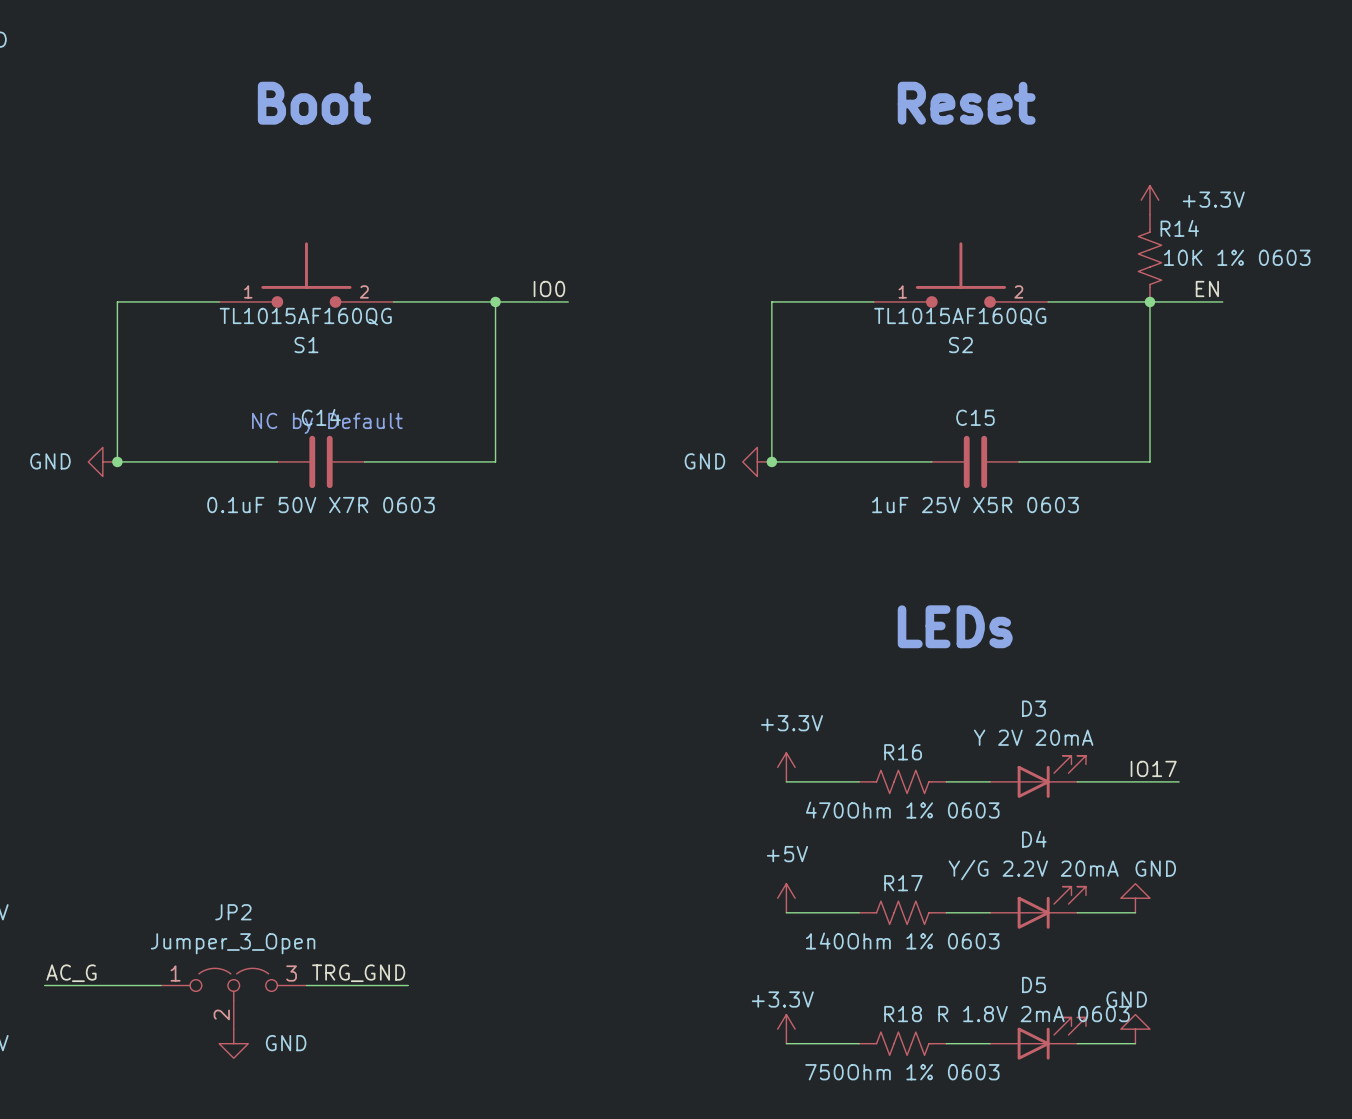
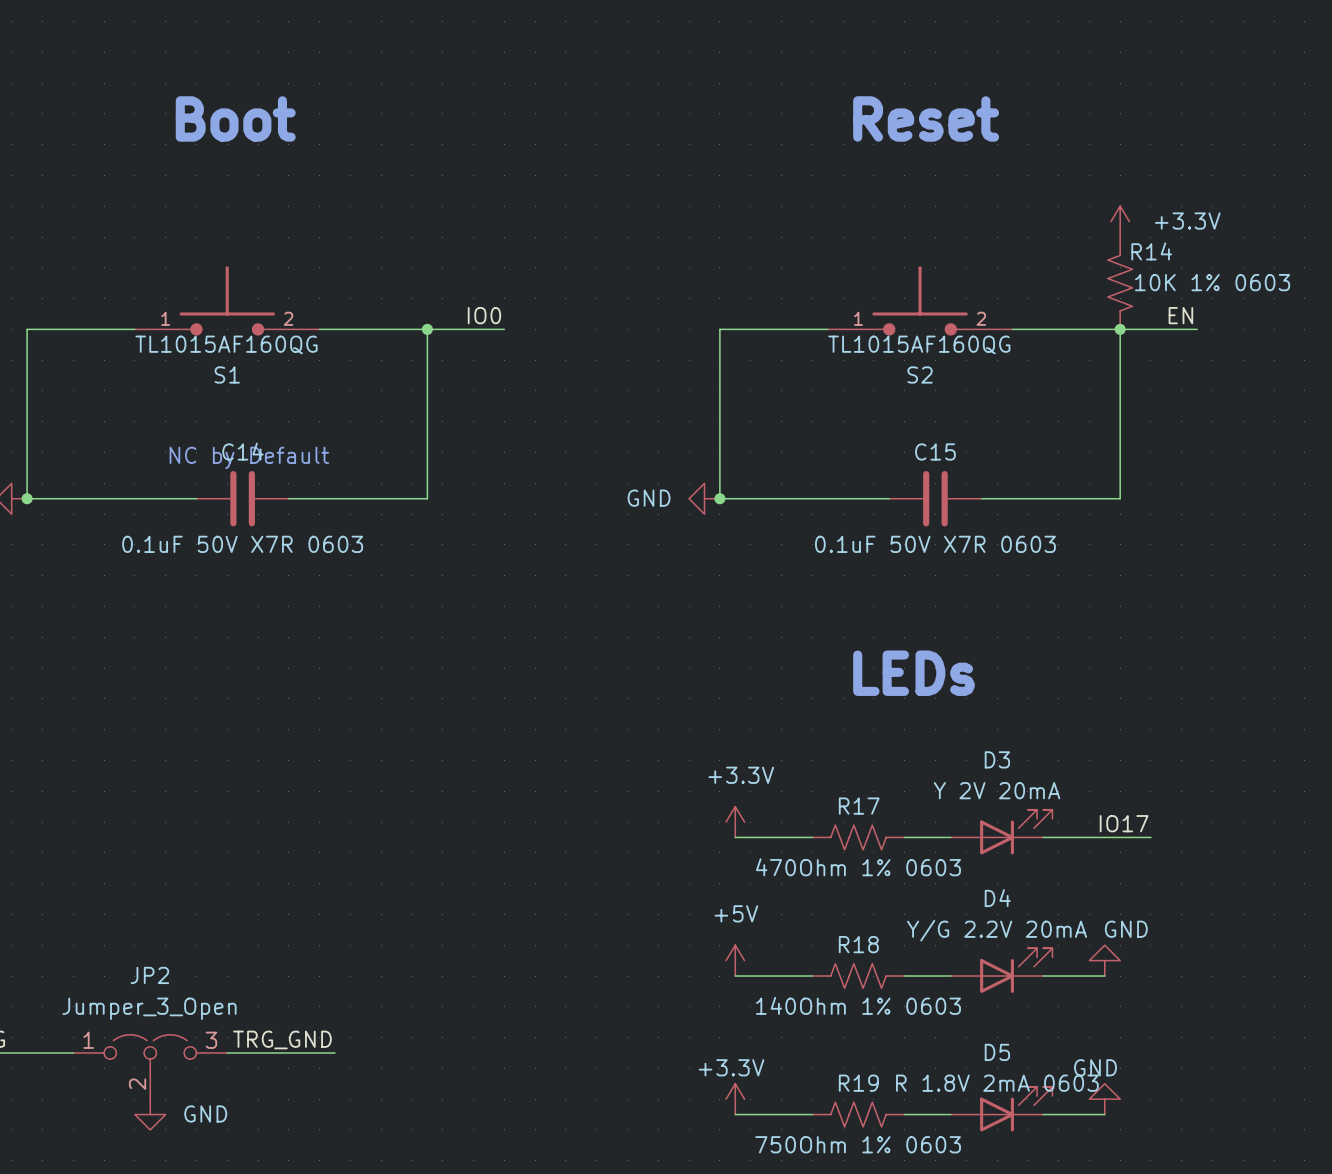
C15 value: 1uF 25V X5R 0603 (975, 505) -> 0.1uF 50V X7R 0603 (935, 544)
R16 name: R16 (903, 752) -> R17 (859, 806)
R17 name: R17 (903, 883) -> R18 (858, 944)
R18 name: R18 (903, 1014) -> R19 (858, 1083)

